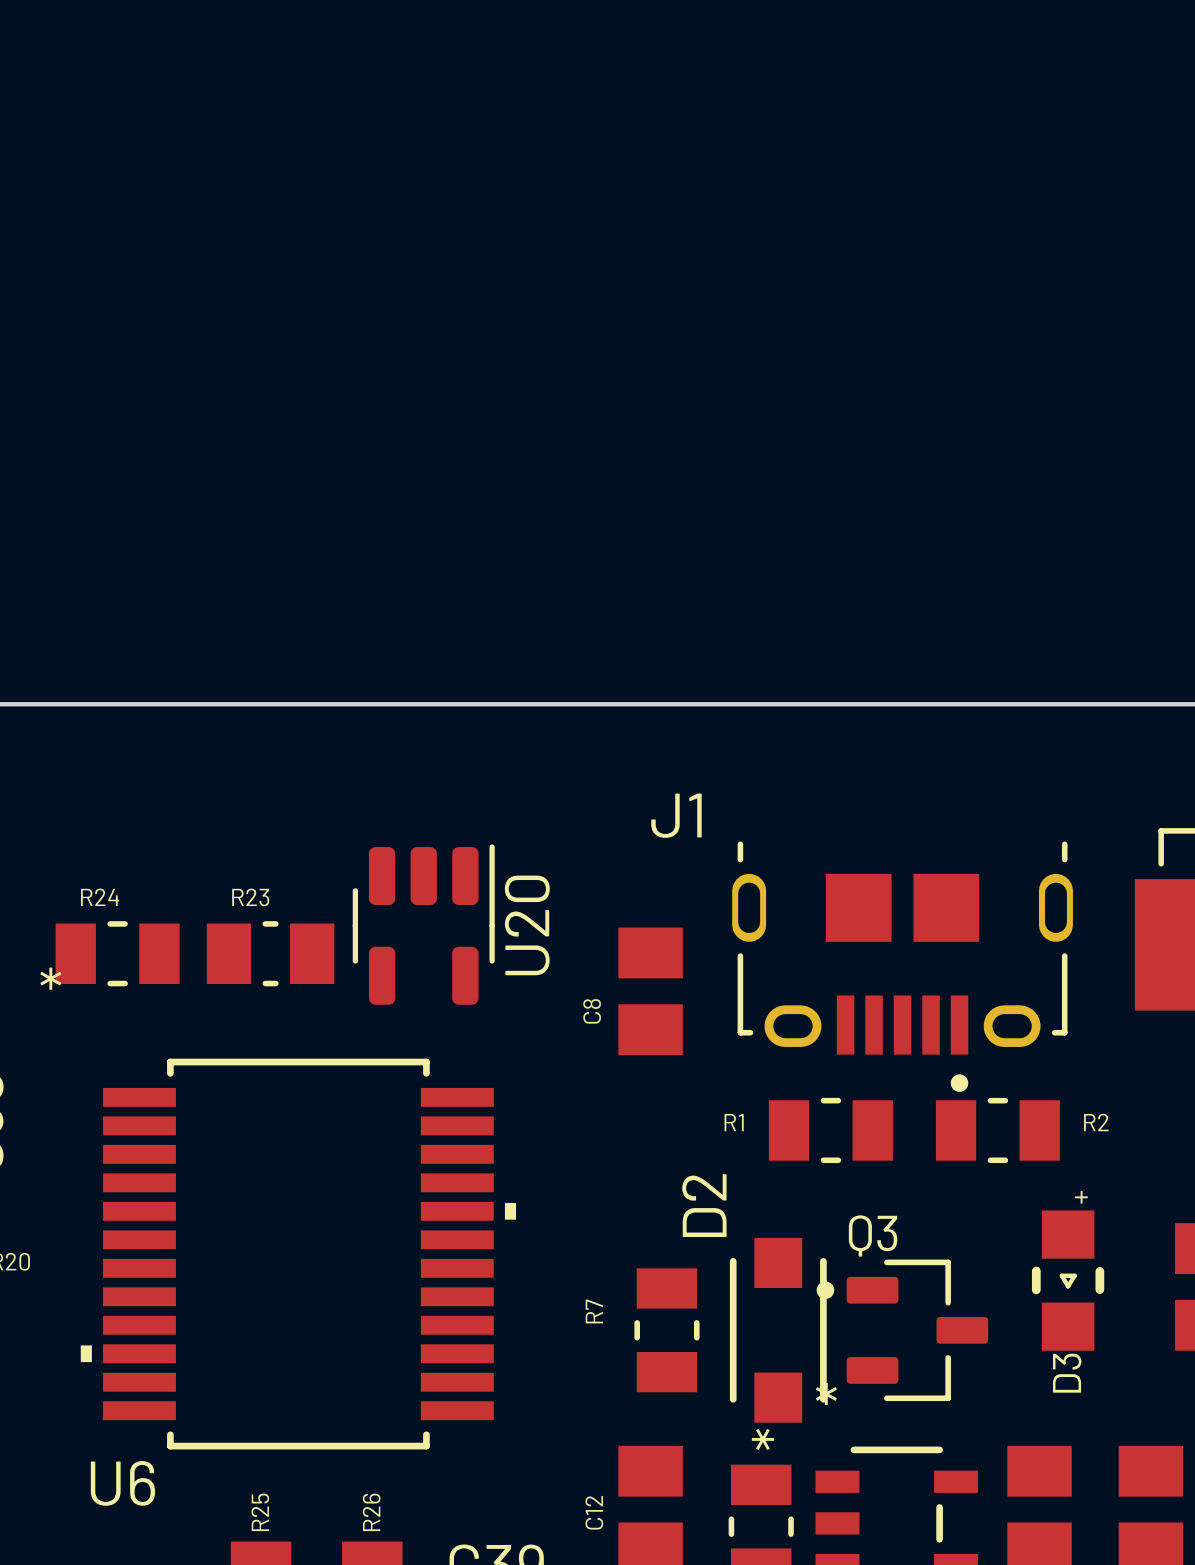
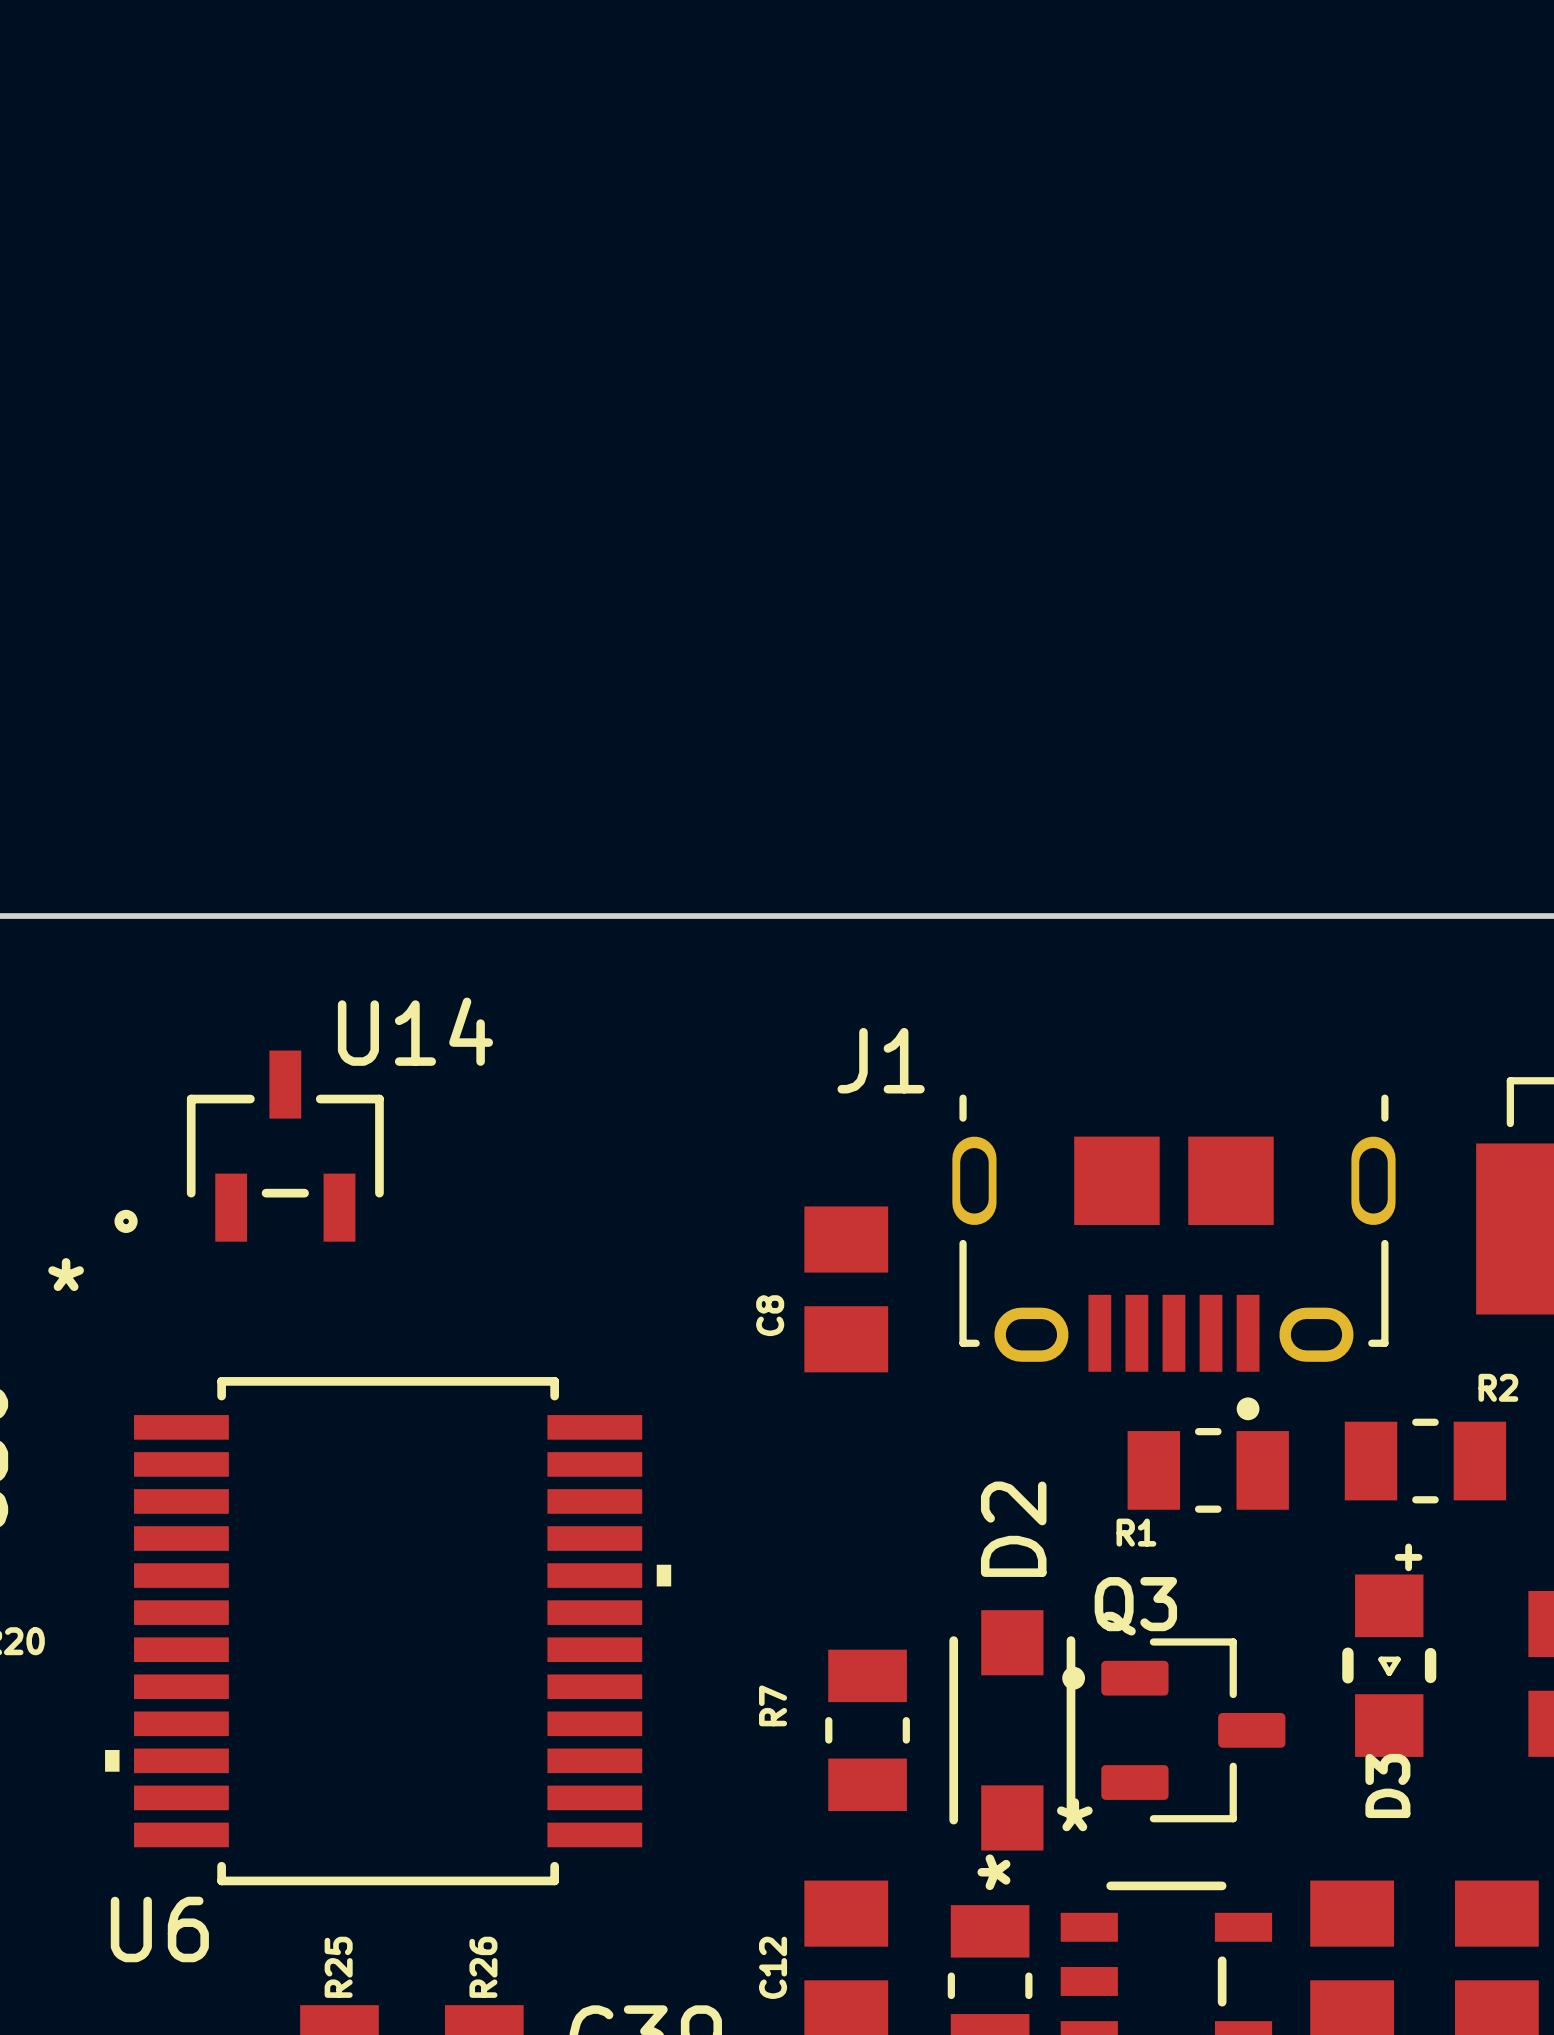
U14: none -> (249, 1146)
U20: (423, 924) -> none
R24: (117, 953) -> none
R23: (270, 953) -> none
R1 name position: R1 (734, 1122) -> R1 (1136, 1532)
R2 name position: R2 (1096, 1122) -> R2 (1498, 1387)
R1 position: (830, 1130) -> (1208, 1470)
R2 position: (997, 1130) -> (1425, 1461)
D2 name position: D2 (704, 1205) -> D2 (1013, 1529)

